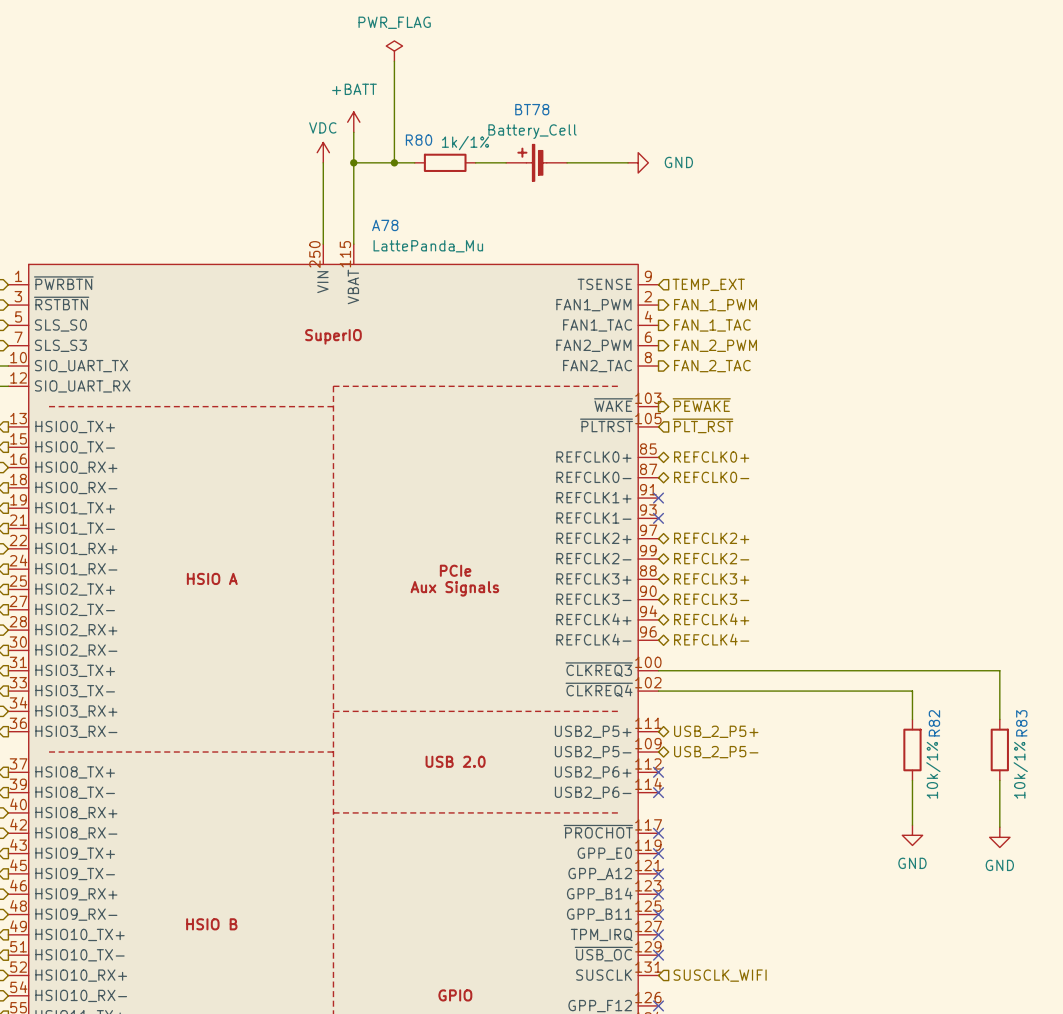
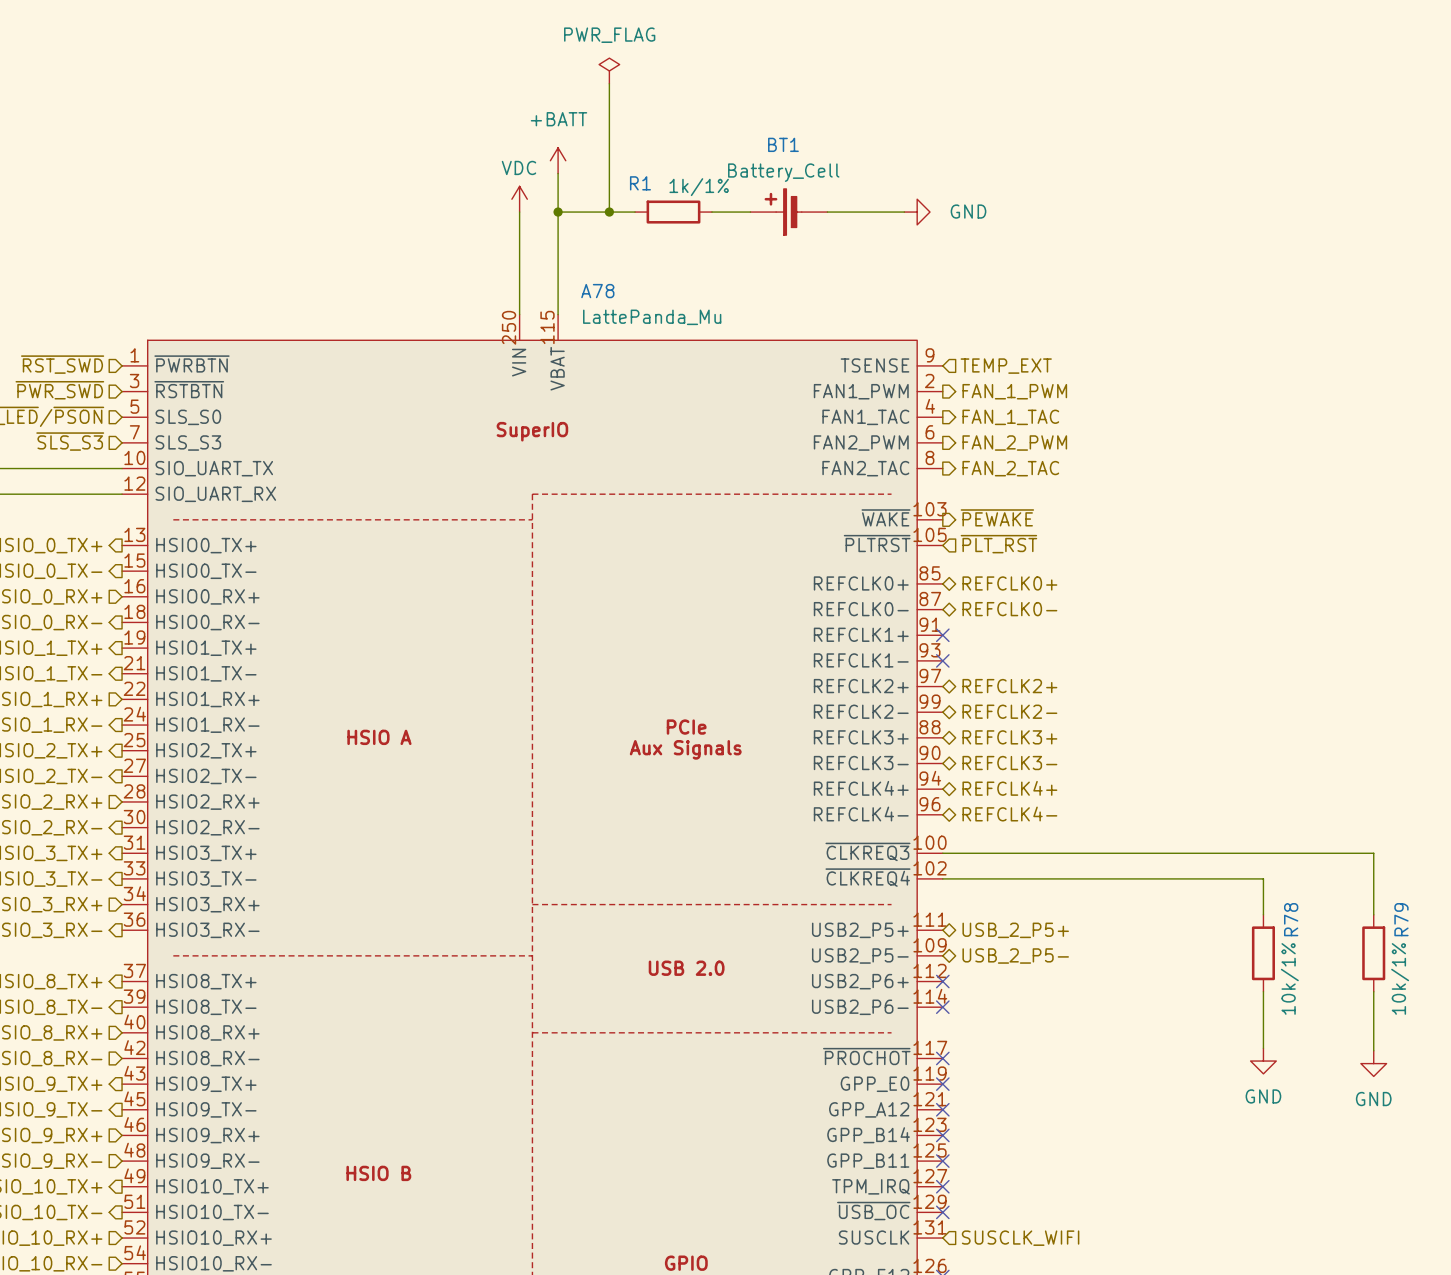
BT78 name: BT78 (532, 109) -> BT1 (783, 144)
R80 name: R80 (419, 140) -> R1 (640, 183)
R82 name: R82 (934, 723) -> R78 (1291, 919)
R83 name: R83 (1021, 723) -> R79 (1401, 919)

